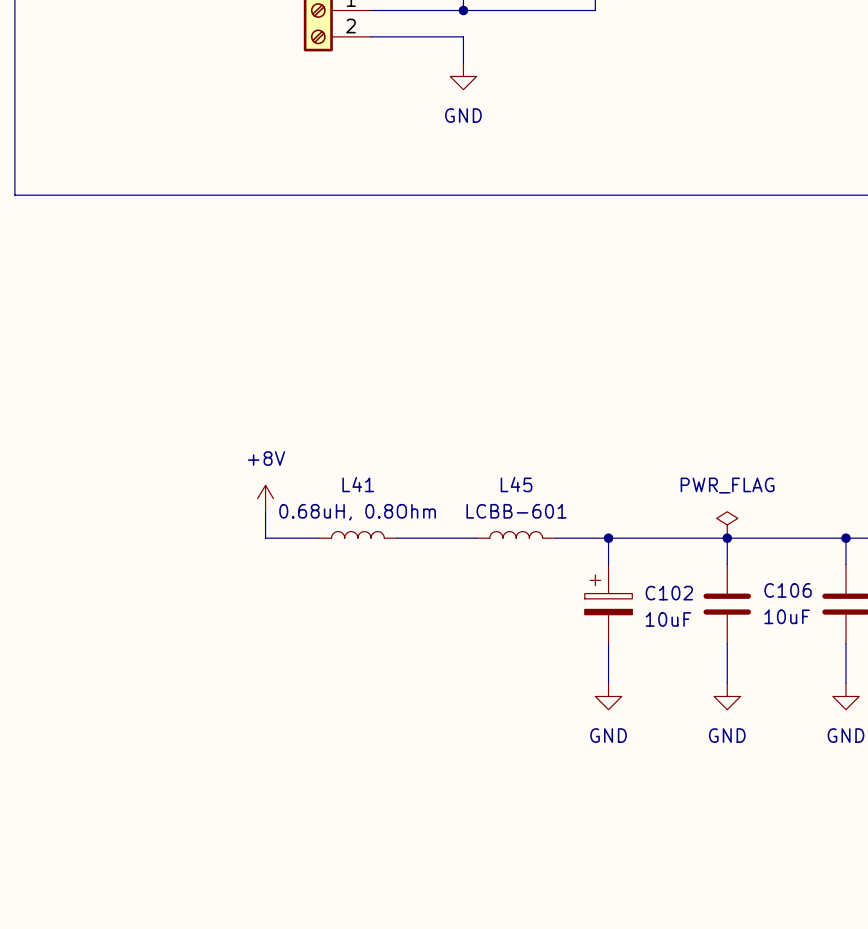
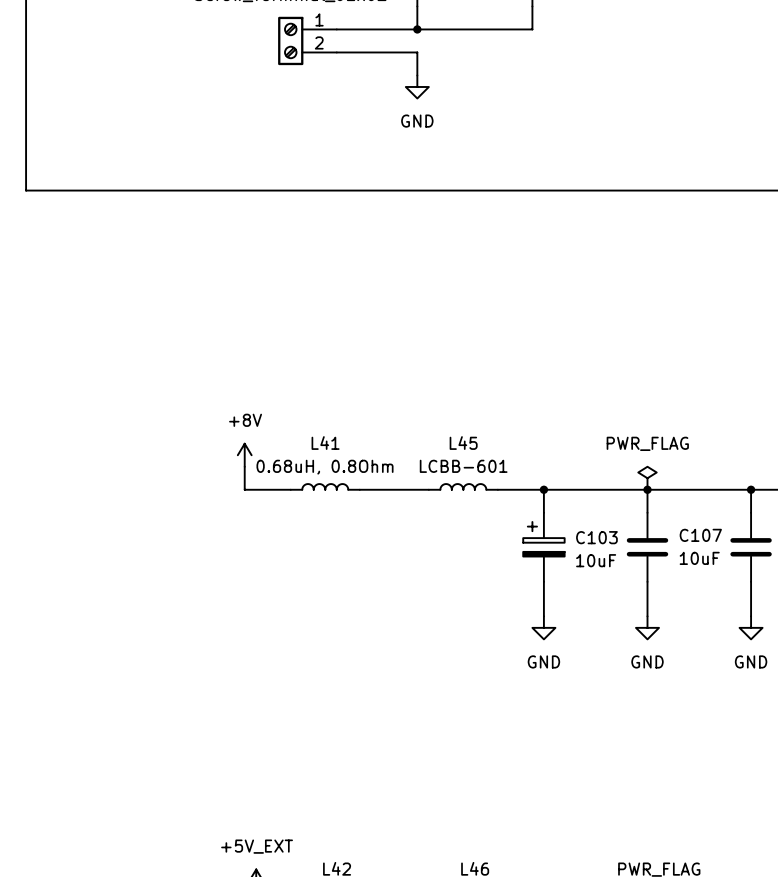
C106 name: C106 (788, 590) -> C107 (700, 535)
C102 name: C102 (669, 593) -> C103 (596, 537)

